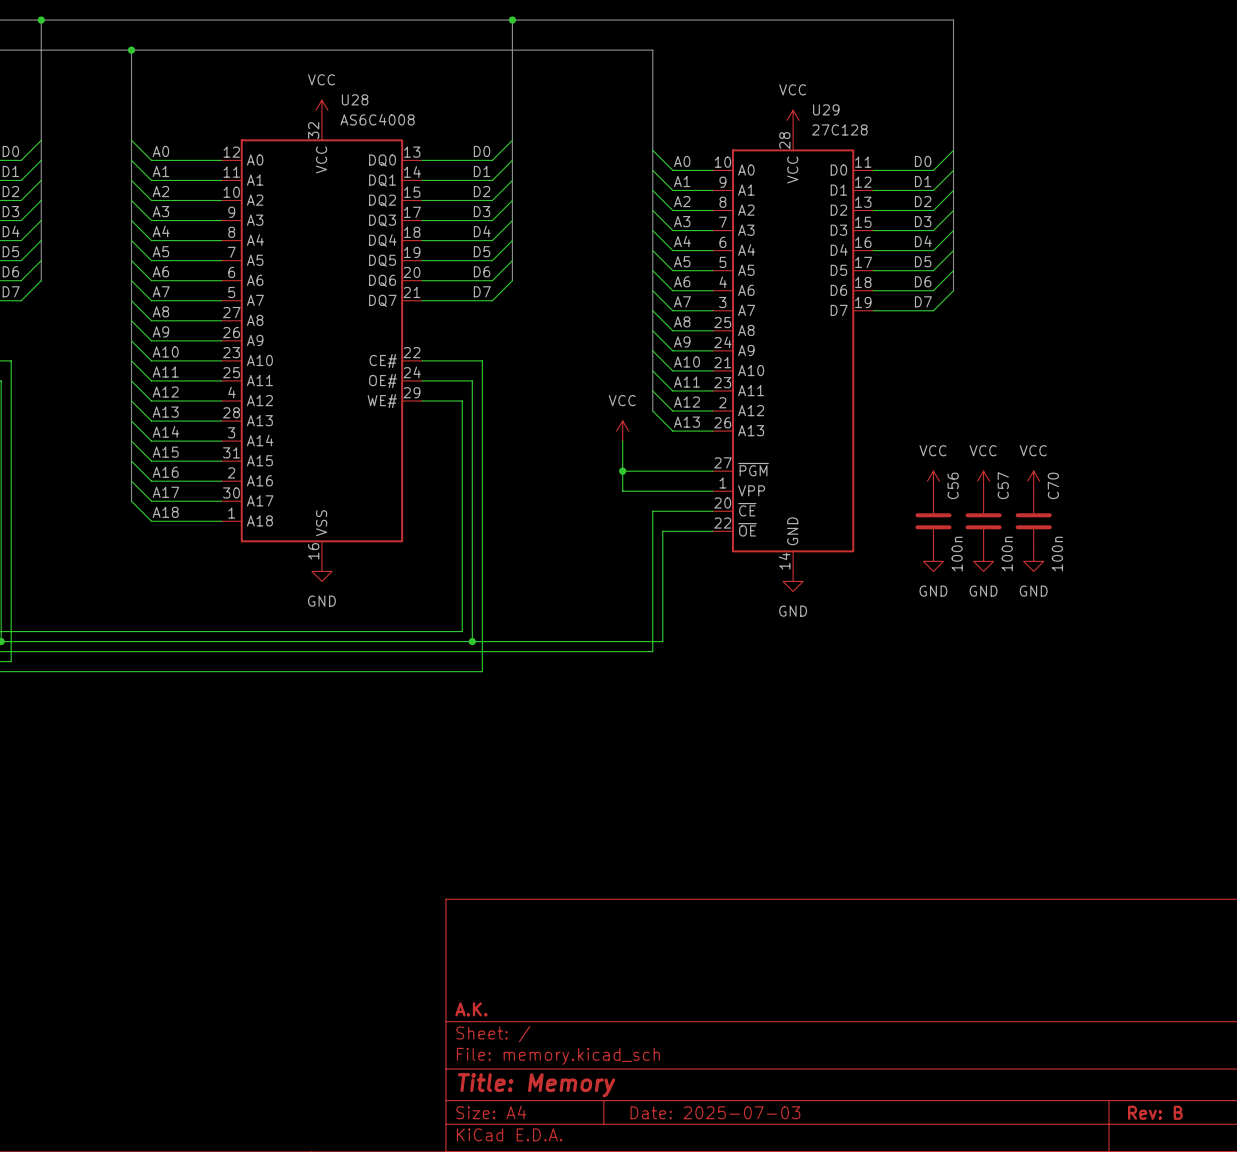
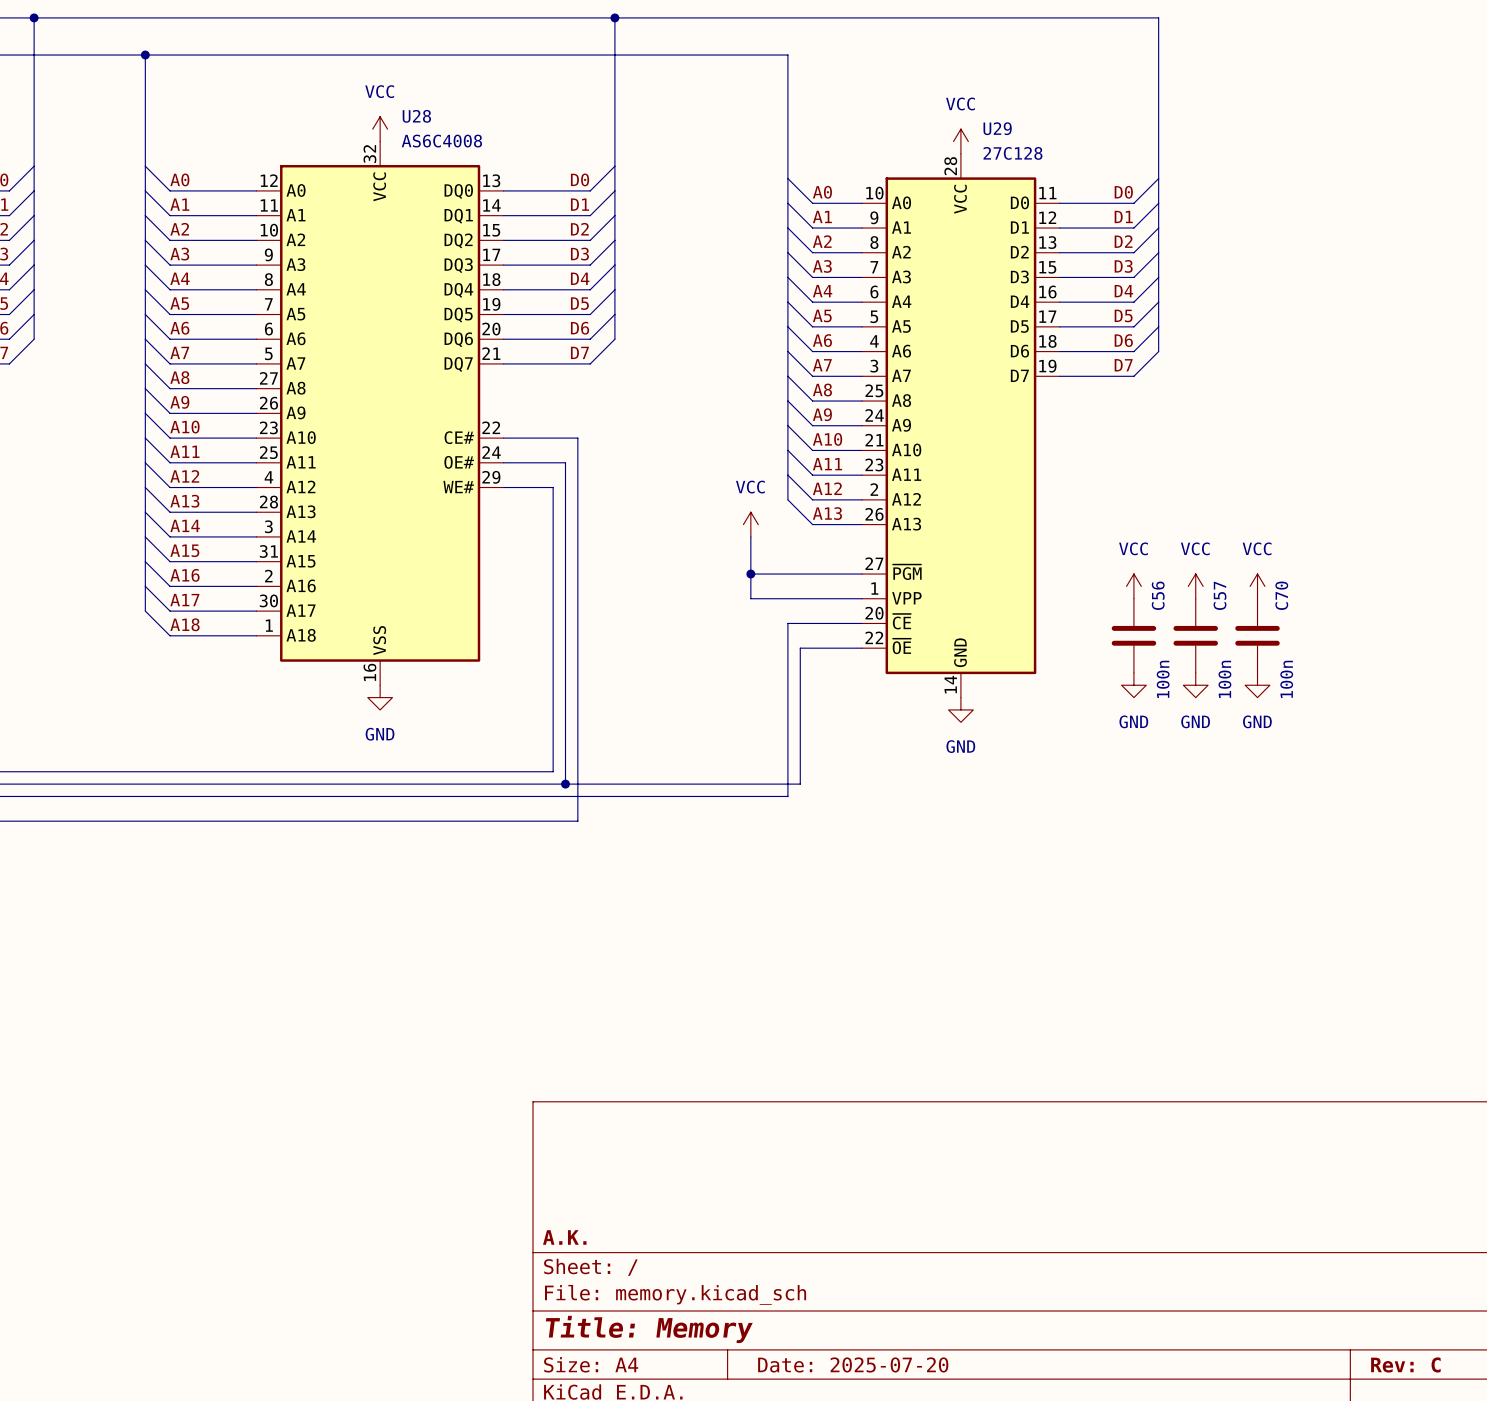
title block: Date: 2025-07-03 (715, 1112) -> Date: 2025-07-20 (853, 1364)
title block: Rev: B (1155, 1112) -> Rev: C (1405, 1364)

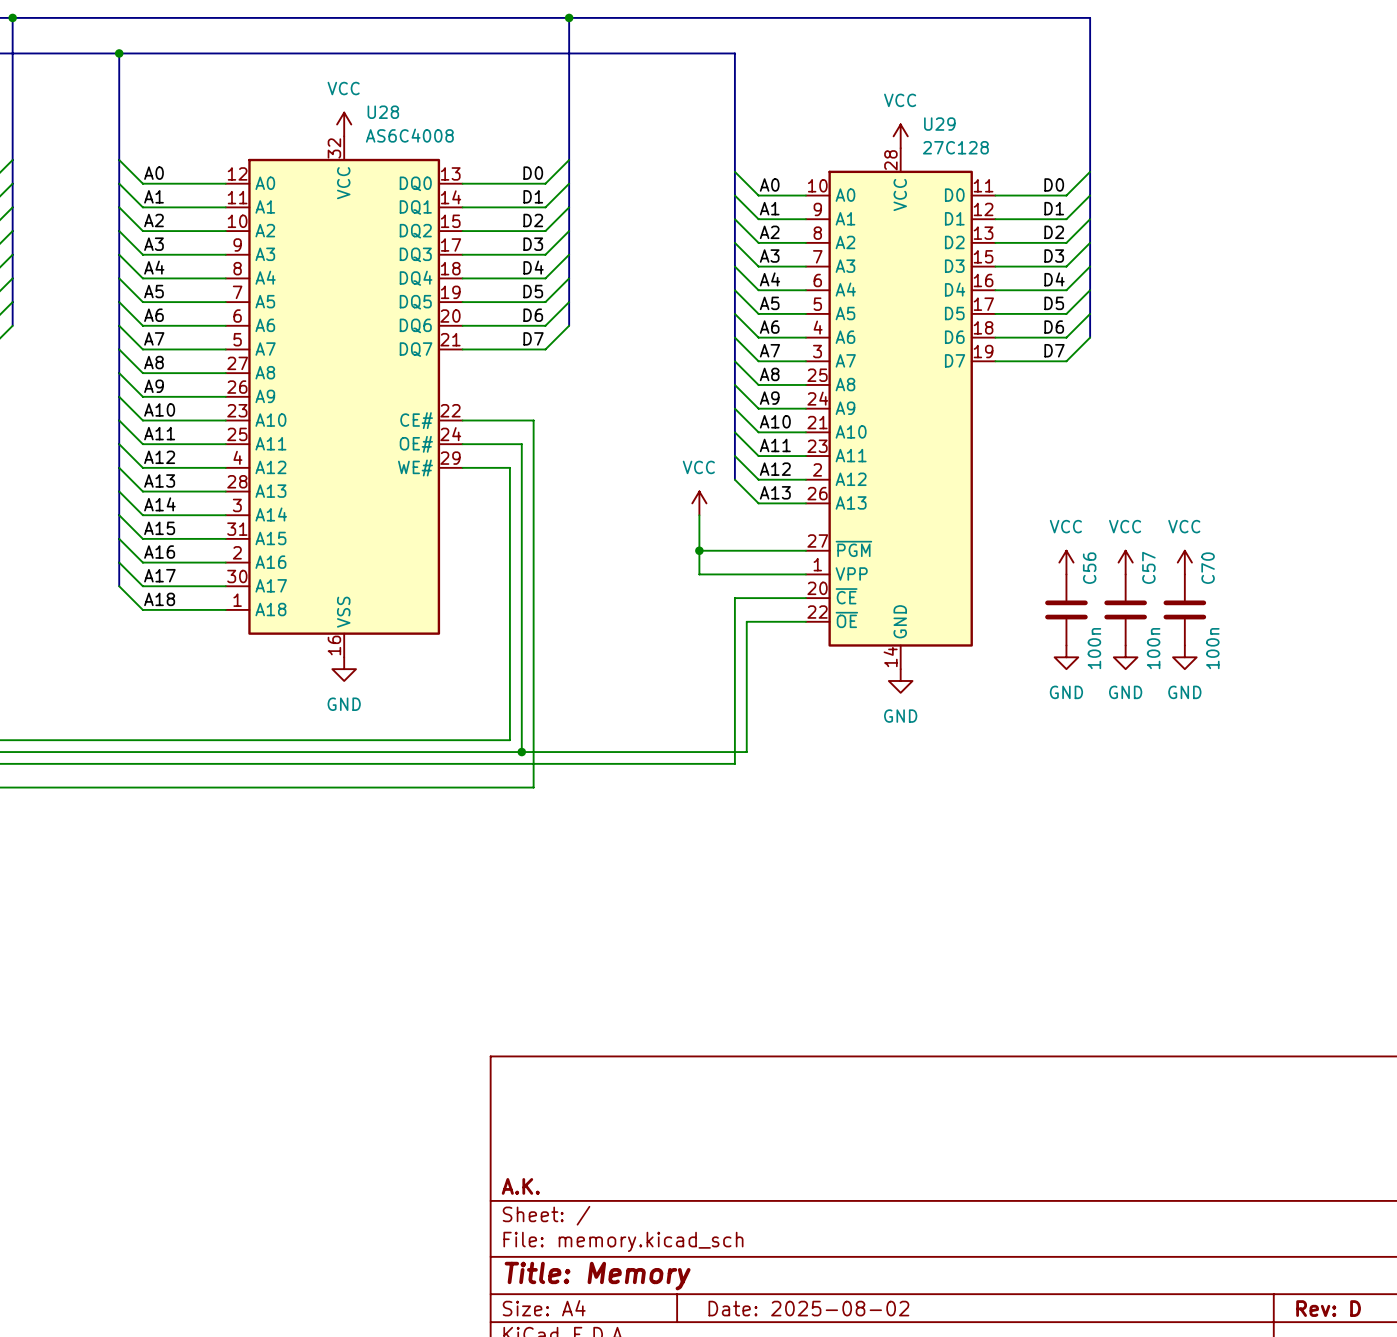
title block: Date: 2025-07-20 (853, 1364) -> Date: 2025-08-02 (808, 1308)
title block: Rev: C (1405, 1364) -> Rev: D (1328, 1308)

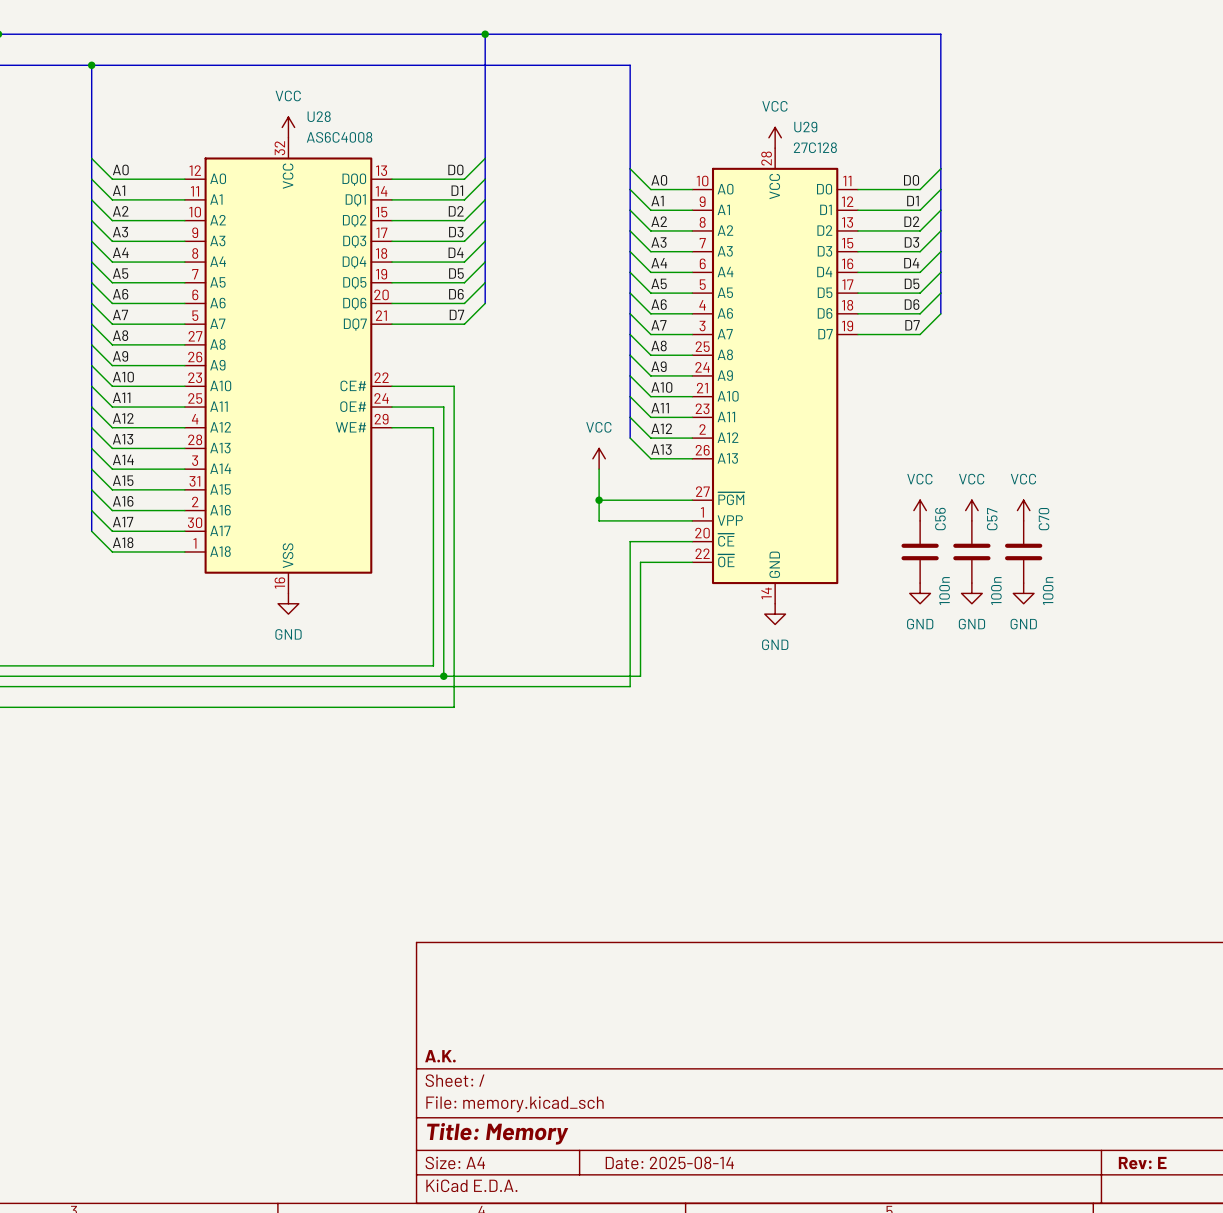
title block: Date: 2025-08-02 (808, 1308) -> Date: 2025-08-14 (669, 1162)
title block: Rev: D (1328, 1308) -> Rev: E (1142, 1163)

